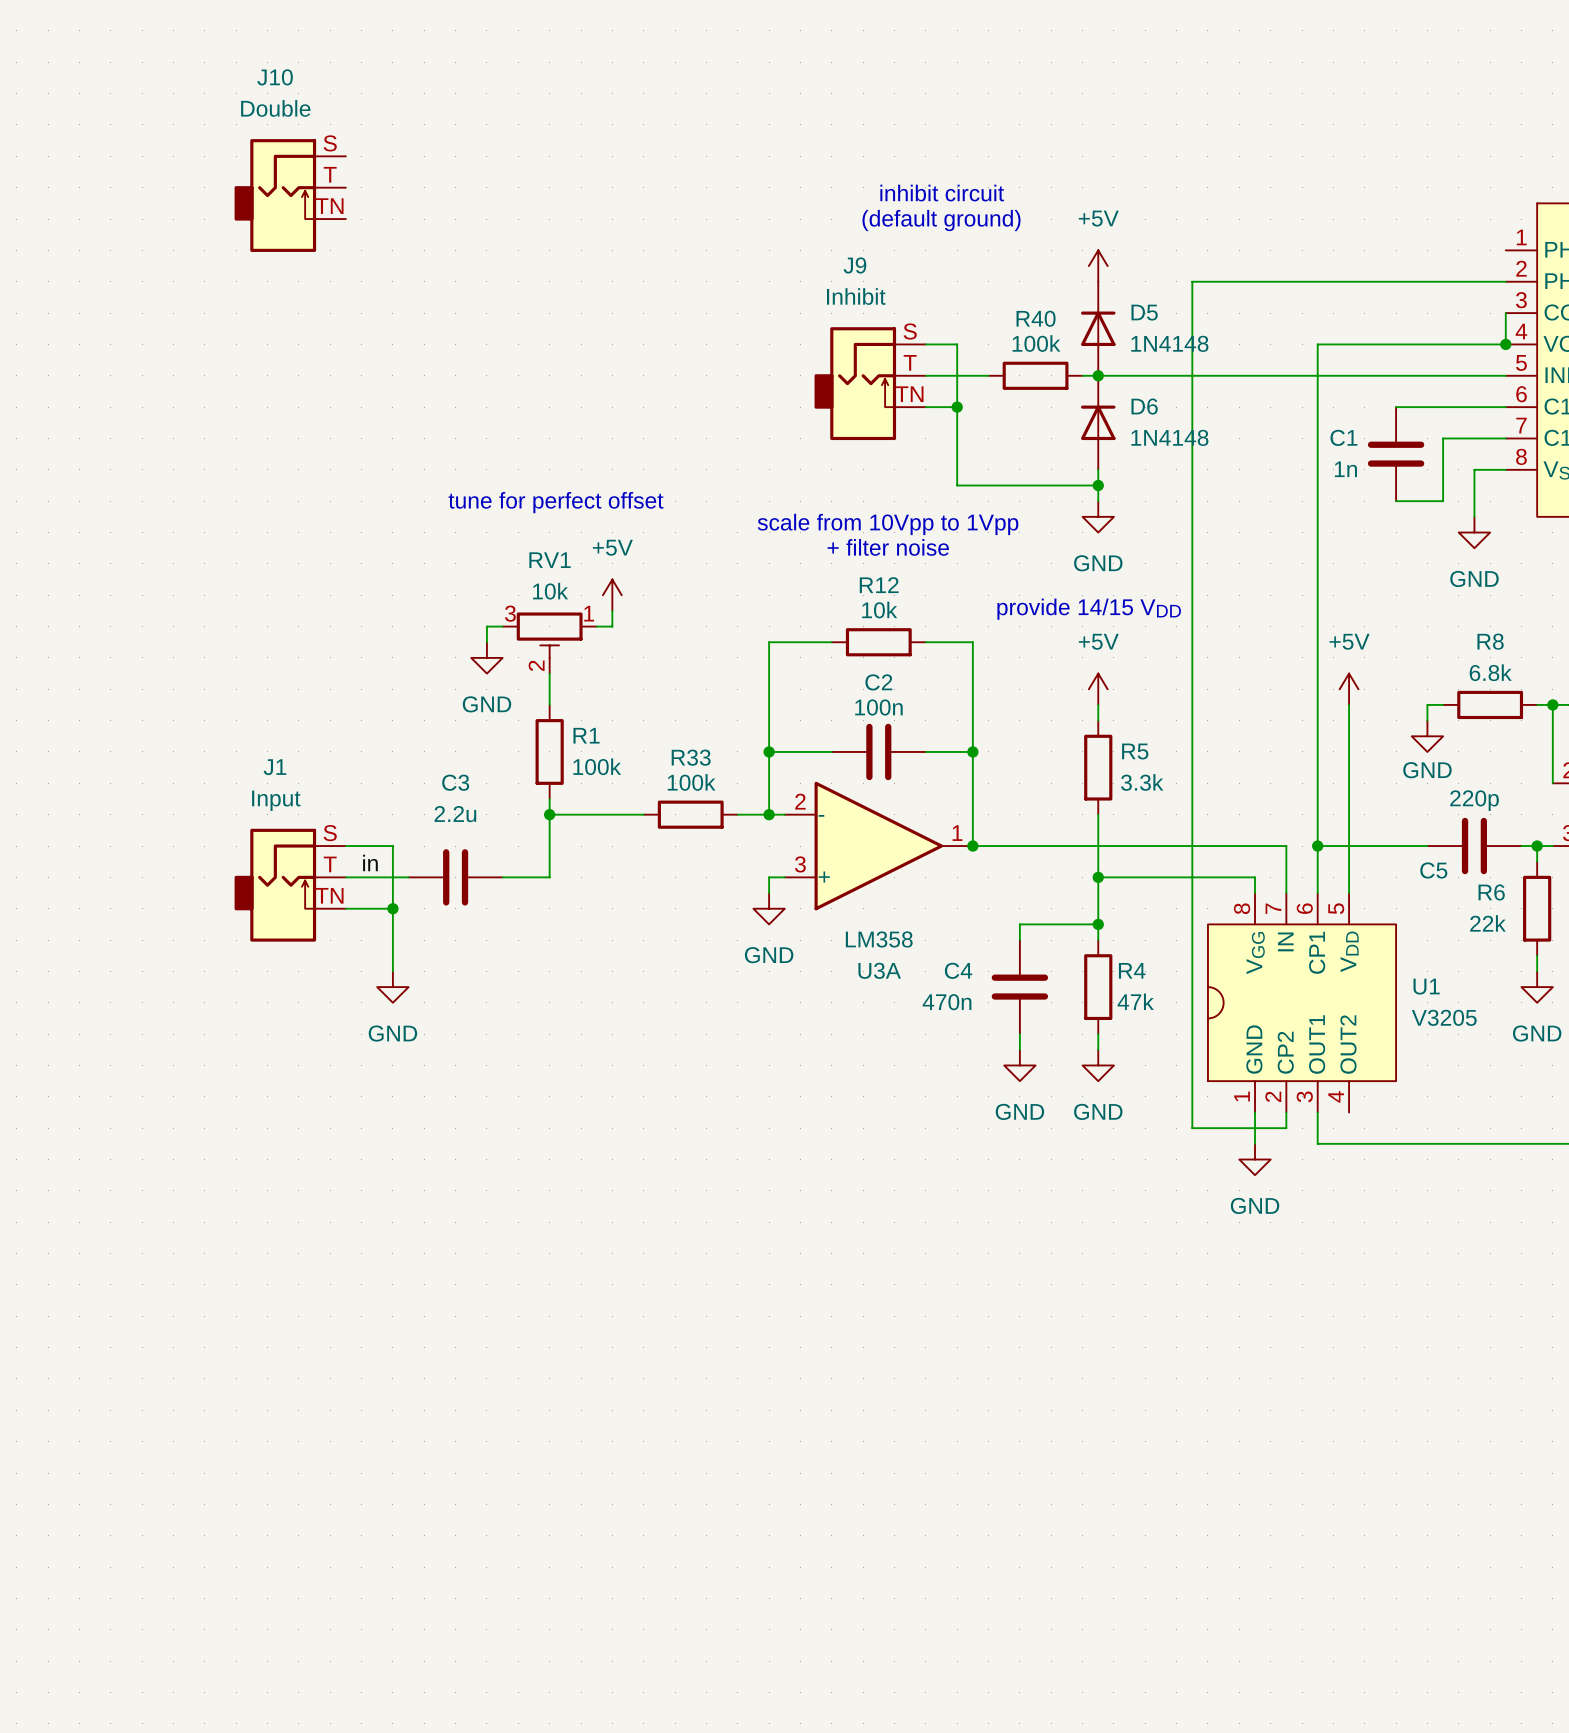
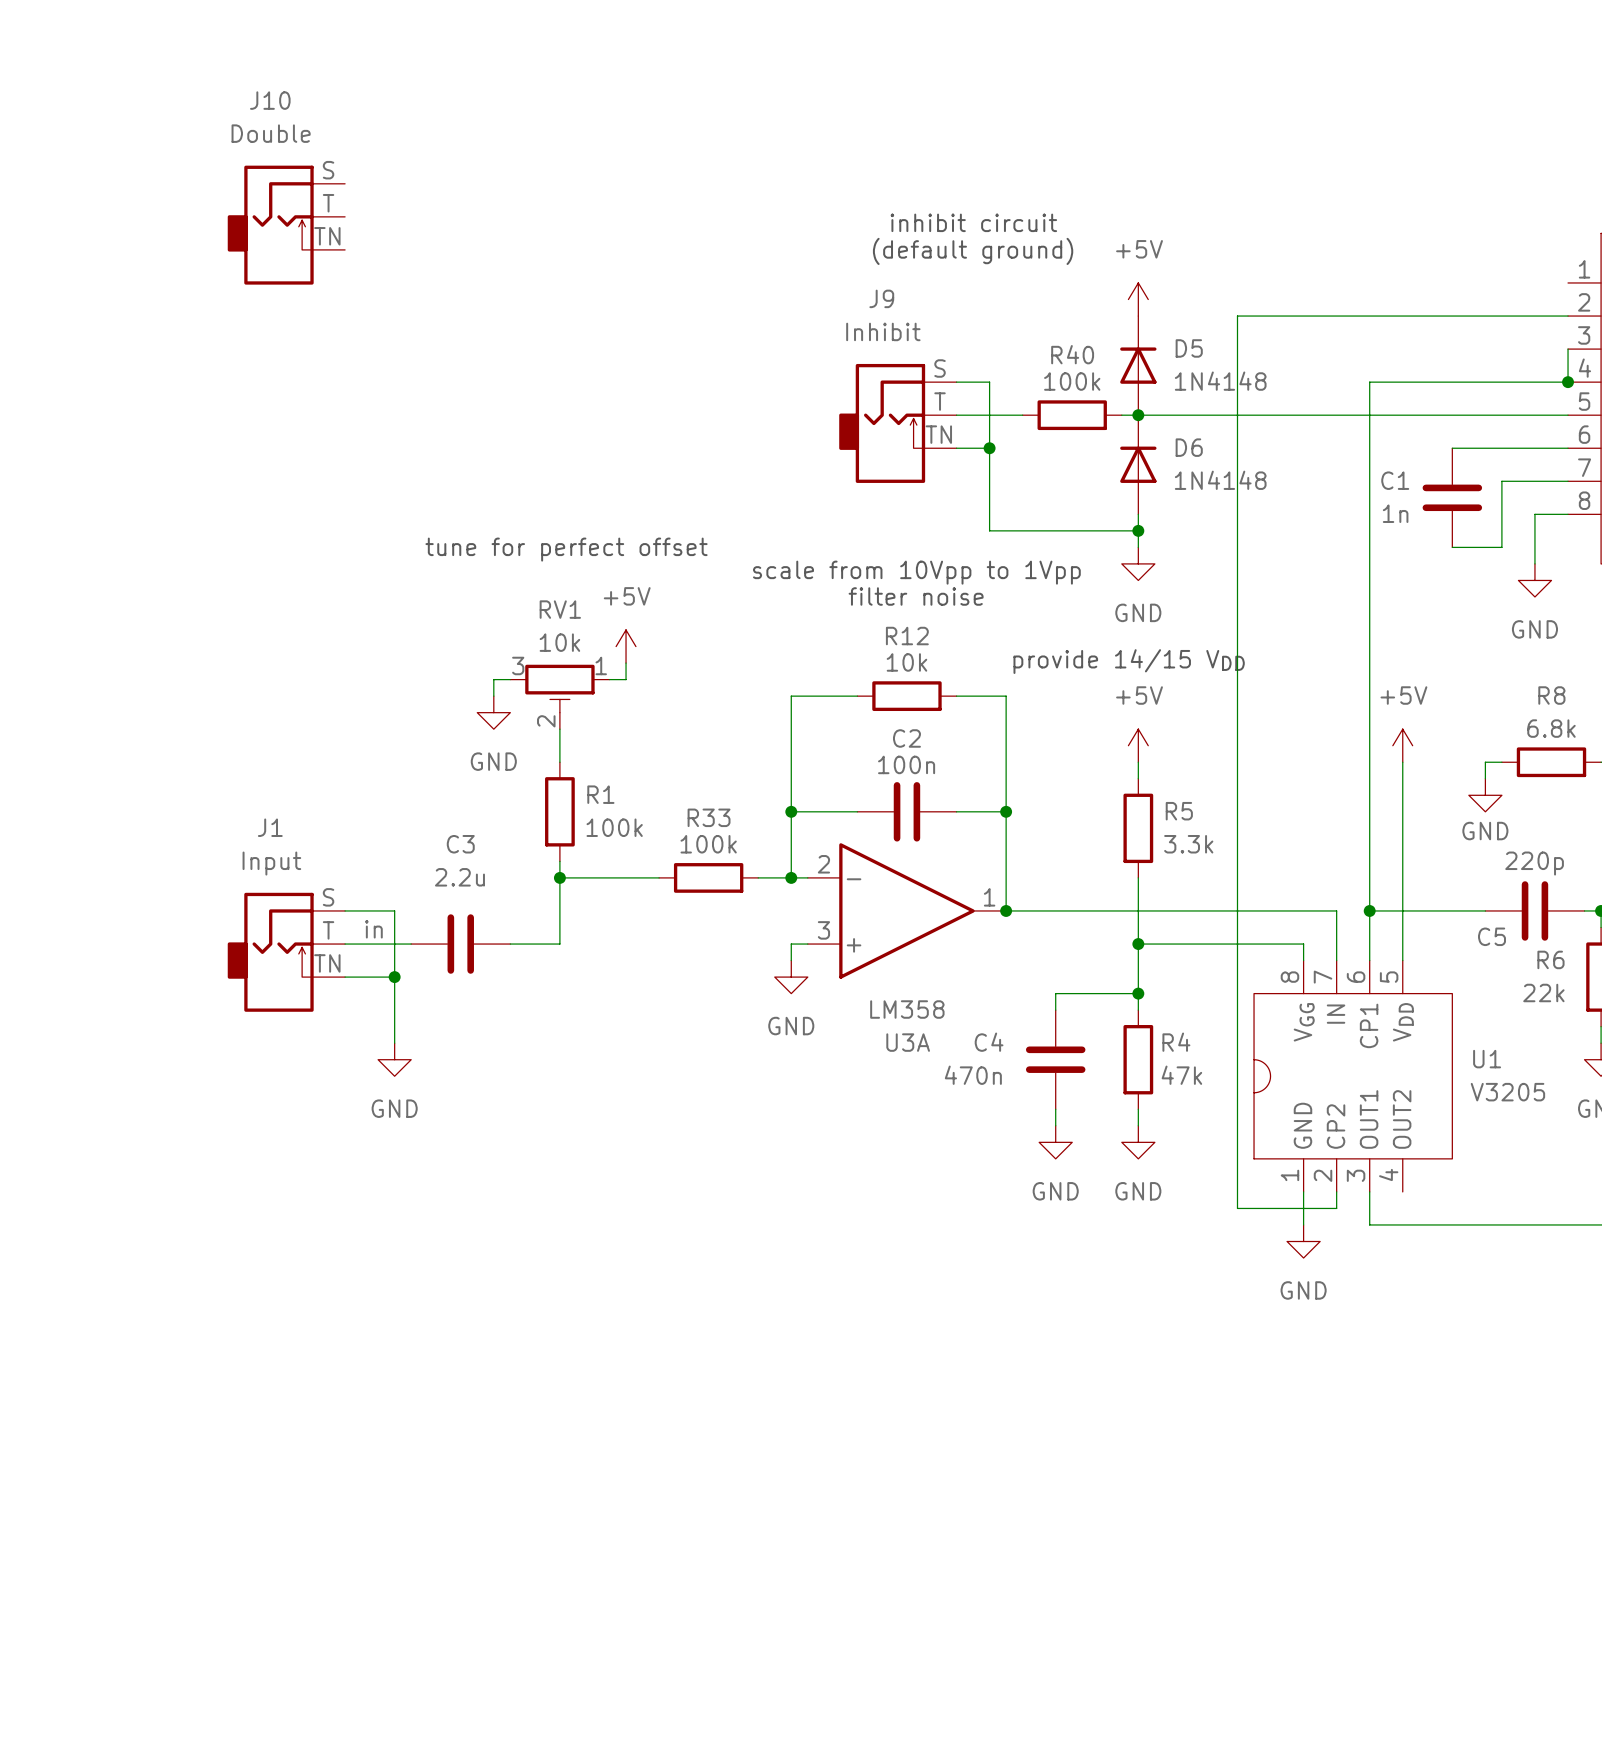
text: + filter noise (888, 547) -> filter noise (916, 596)

